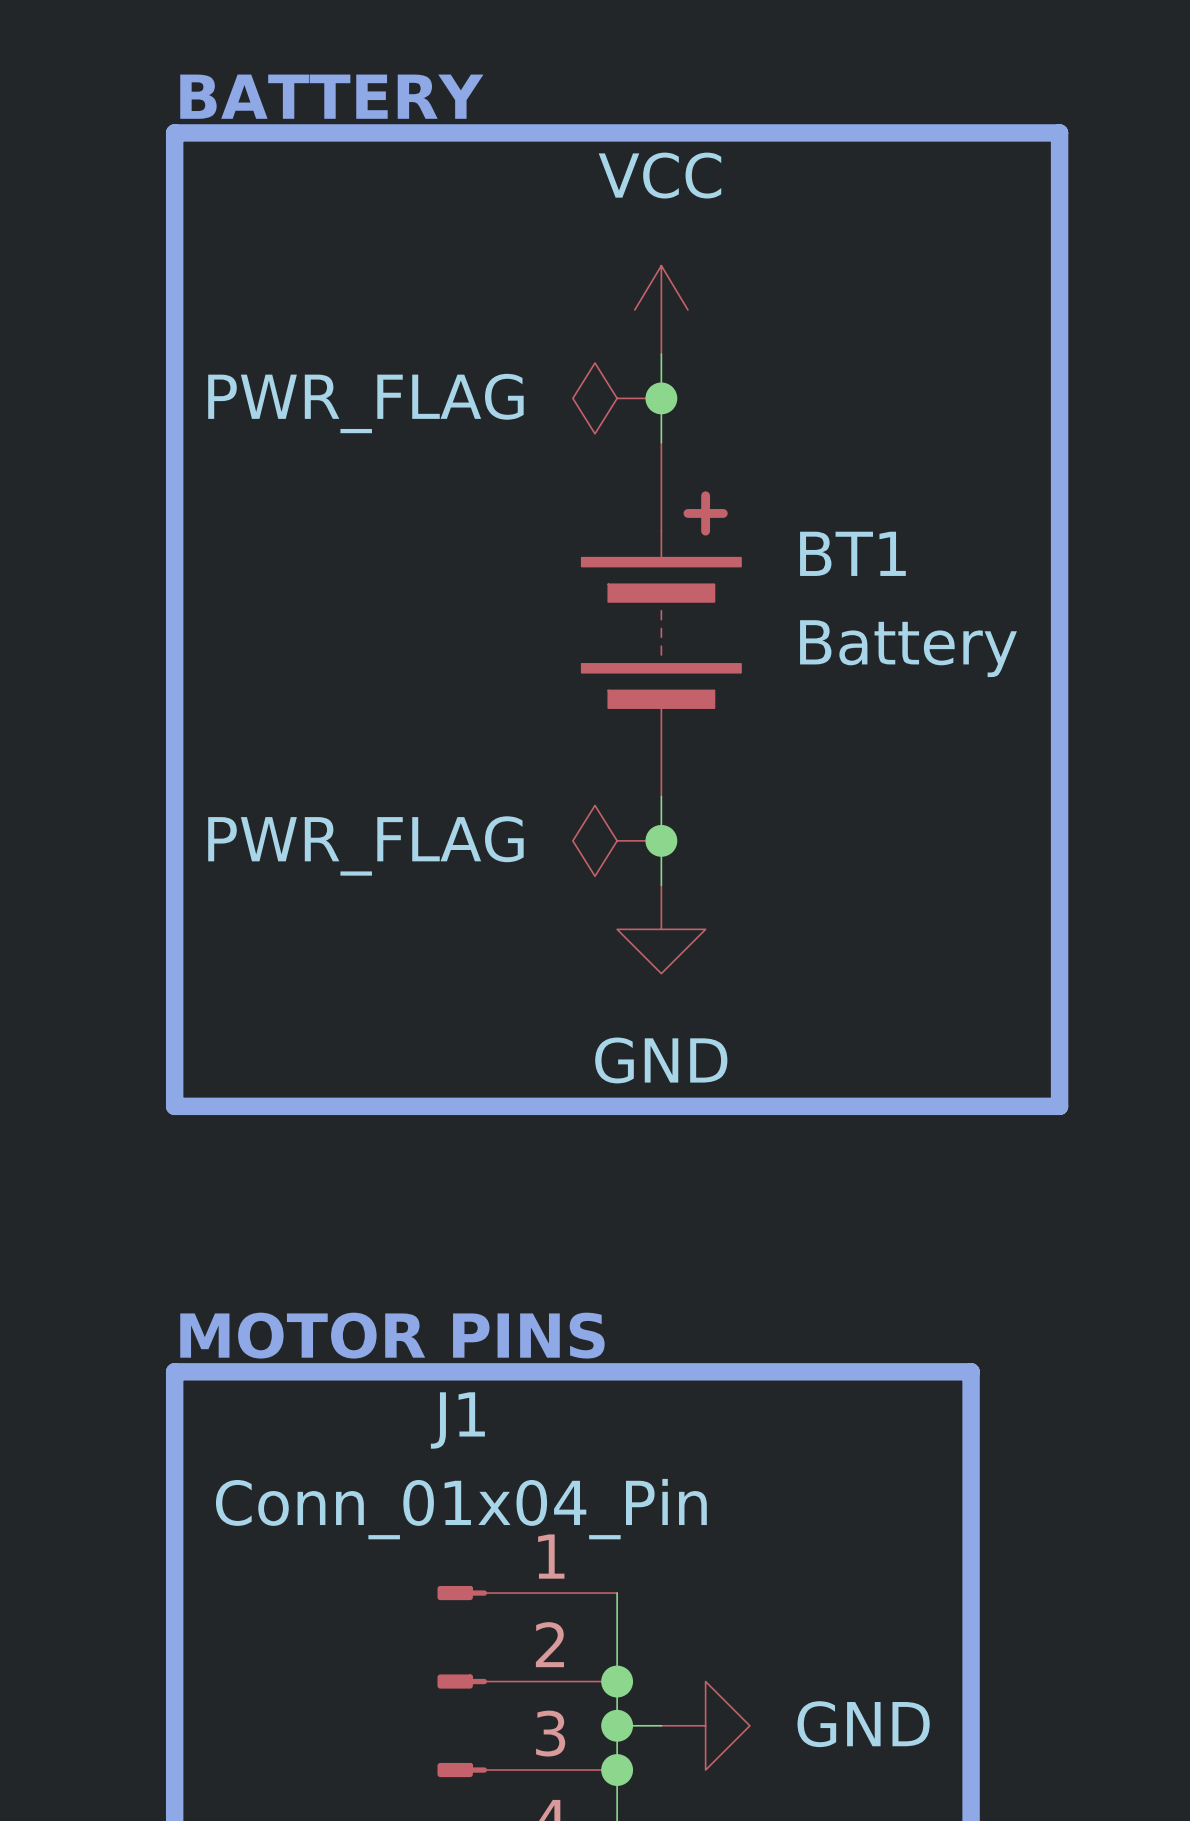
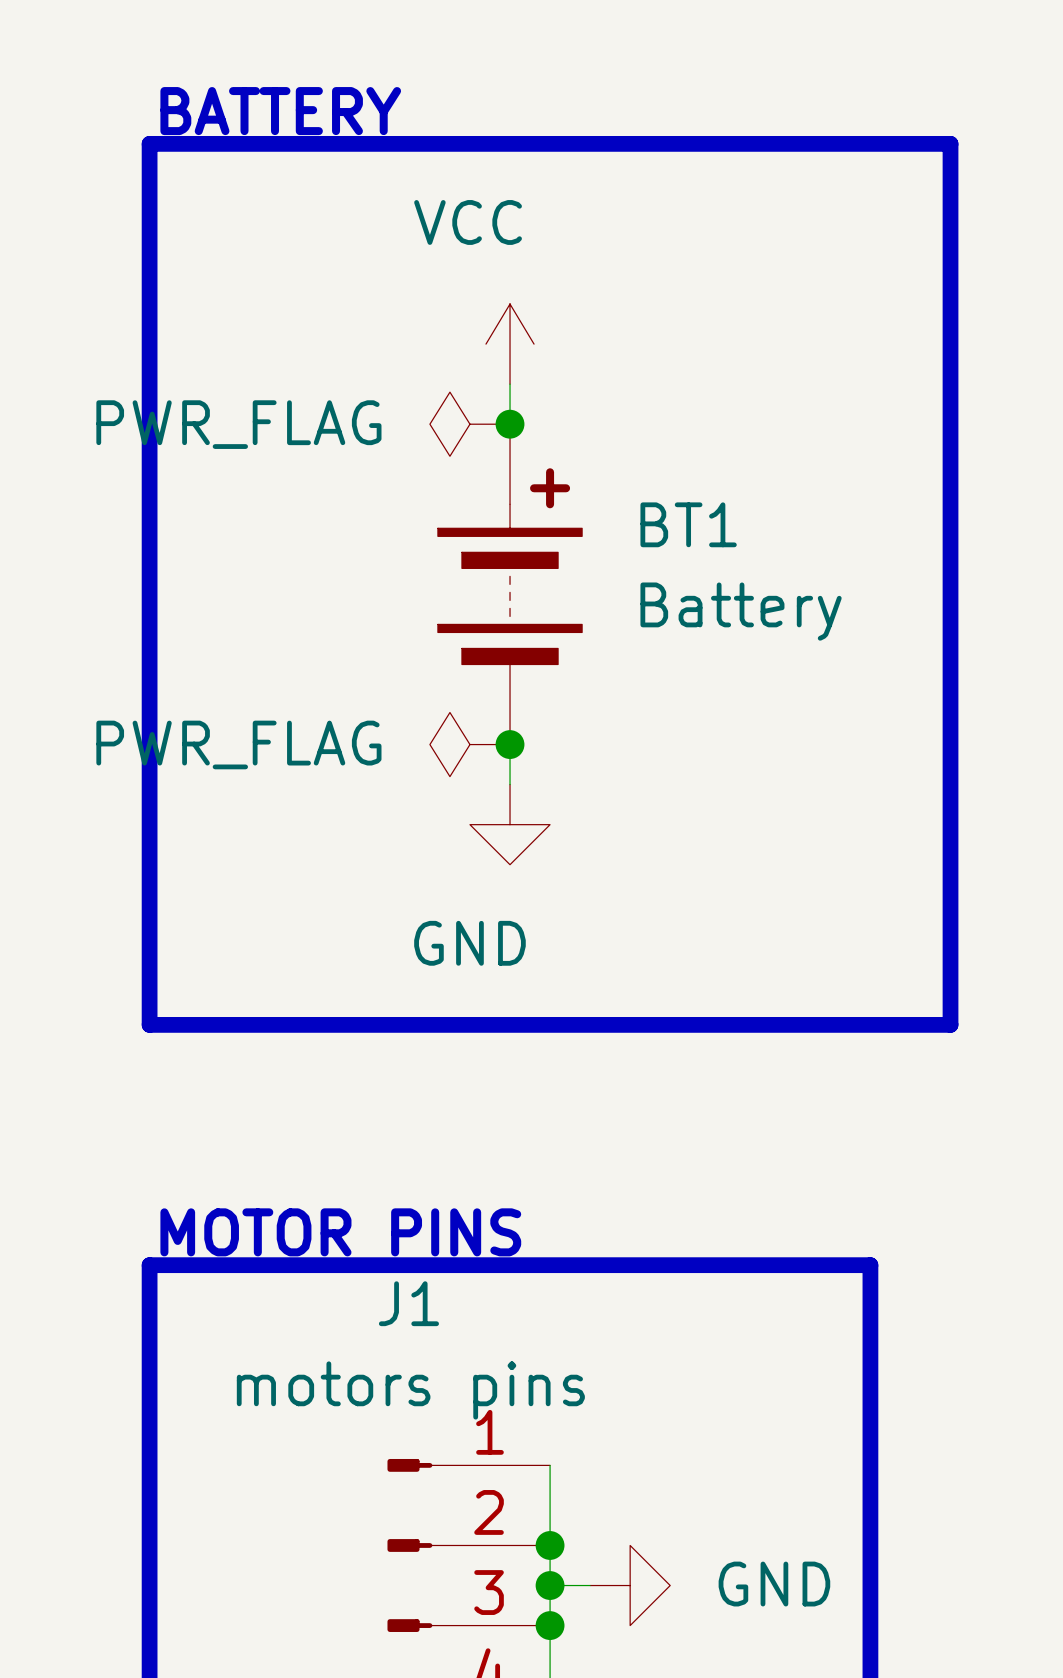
power symbol text position: VCC (659, 175) -> VCC (468, 222)
power symbol position: VCC (661, 309) -> VCC (510, 344)
wire: (661, 354) (661, 442) -> none
wire: none -> (510, 384) (510, 424)
power symbol position: PWR_FLAG (617, 398) -> PWR_FLAG (469, 424)
junction position: (661, 398) -> (510, 424)
BT1 position: (661, 619) -> (510, 584)
wire: none -> (510, 744) (510, 784)
wire: (661, 796) (661, 885) -> none
power symbol position: PWR_FLAG (617, 840) -> PWR_FLAG (469, 744)
junction position: (661, 840) -> (510, 744)
power symbol position: GND (661, 929) -> GND (510, 824)
power symbol text position: GND (661, 1060) -> GND (469, 943)
J1 value: Conn_01x04_Pin (461, 1509) -> motors pins (410, 1390)

